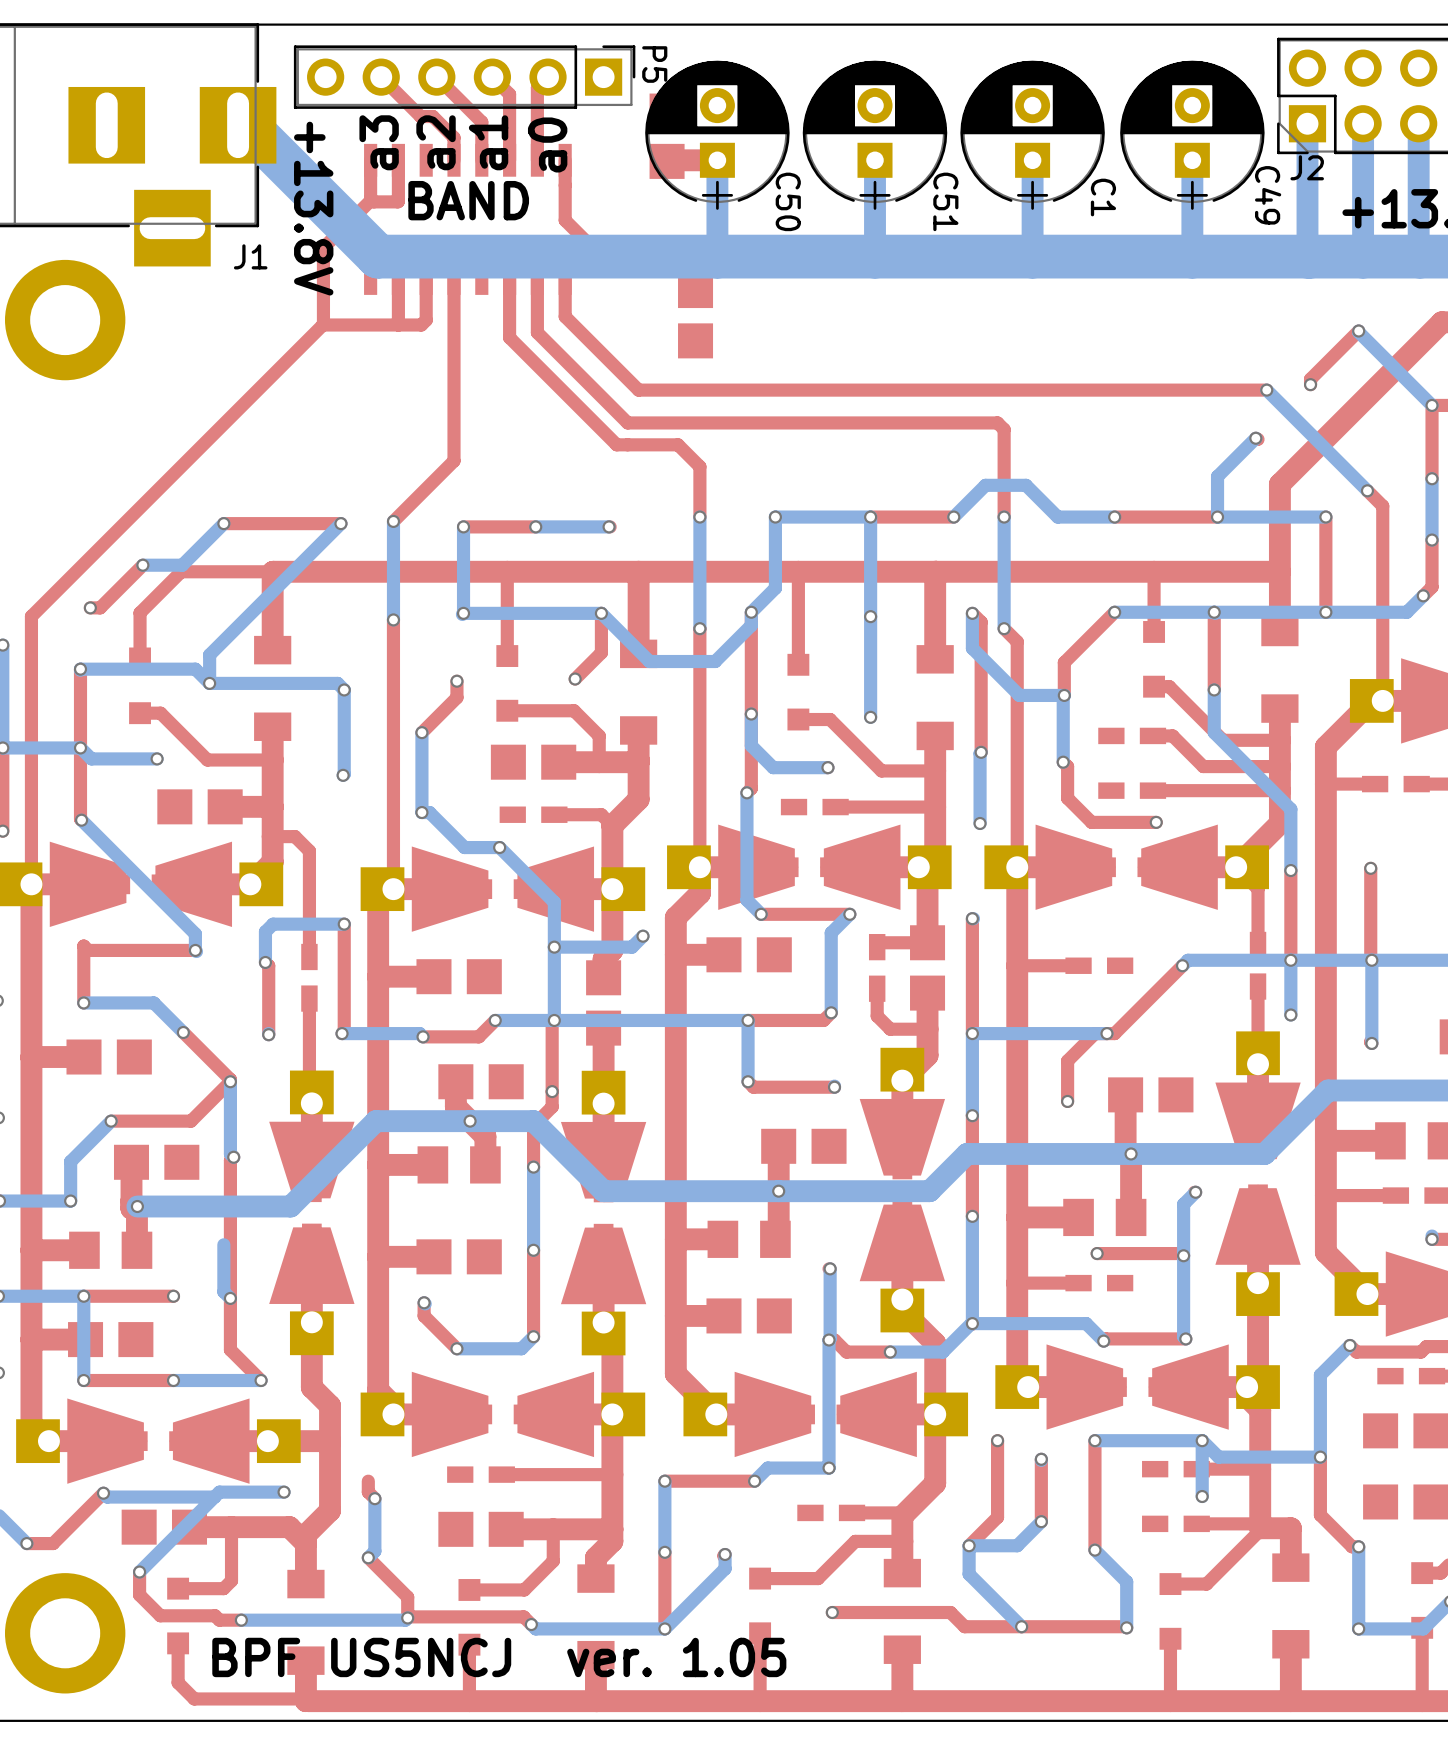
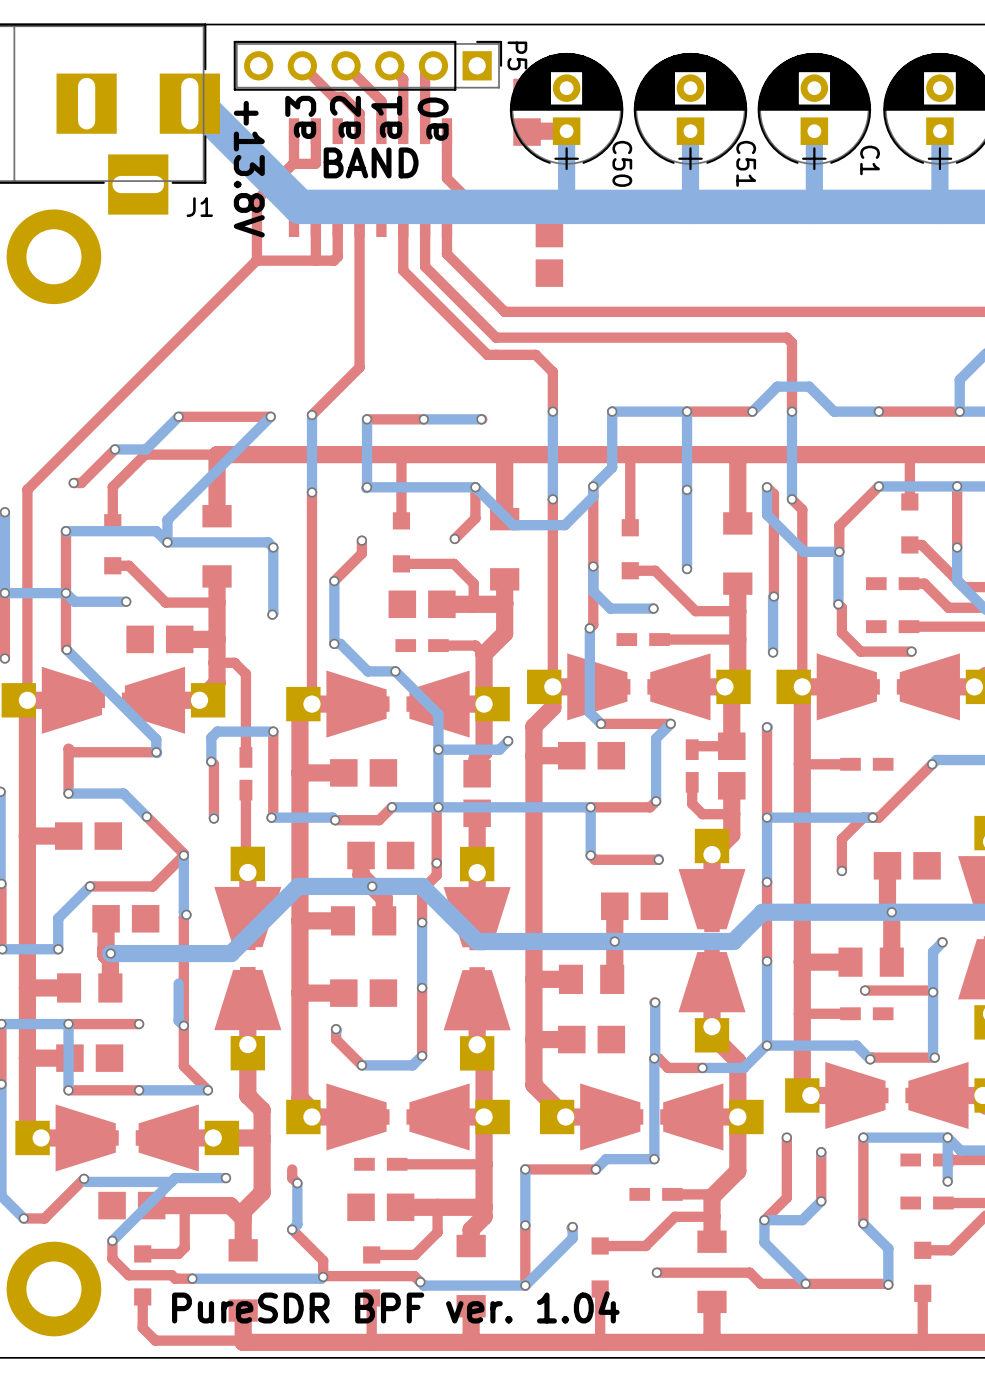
text: BPF US5NCJ ver. 1.05 (499, 1657) -> PureSDR BPF ver. 1.04 (395, 1307)

